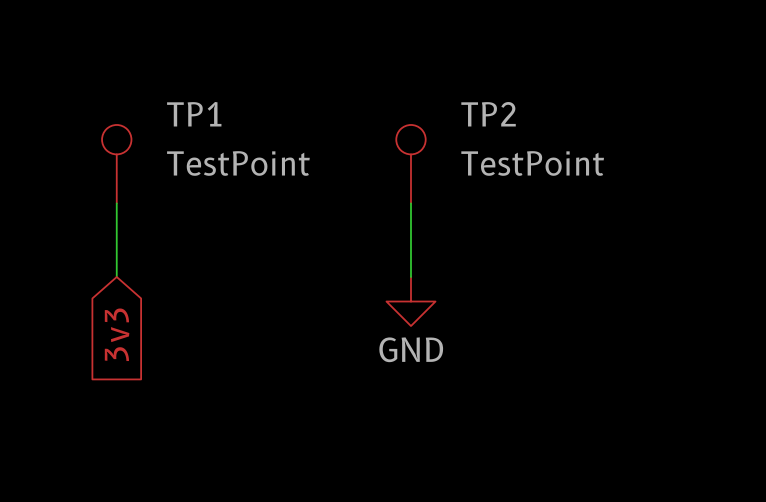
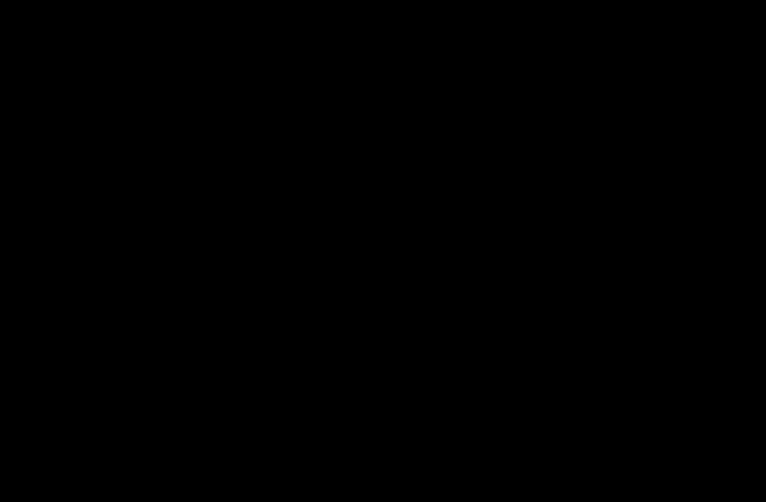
TP1: TestPoint (116, 164) -> none
TP2: TestPoint (410, 164) -> none
wire: (116, 203) (116, 276) -> none
wire: (410, 203) (410, 276) -> none
power symbol: GND (410, 301) -> none
global label: 3v3 (117, 334) -> none

